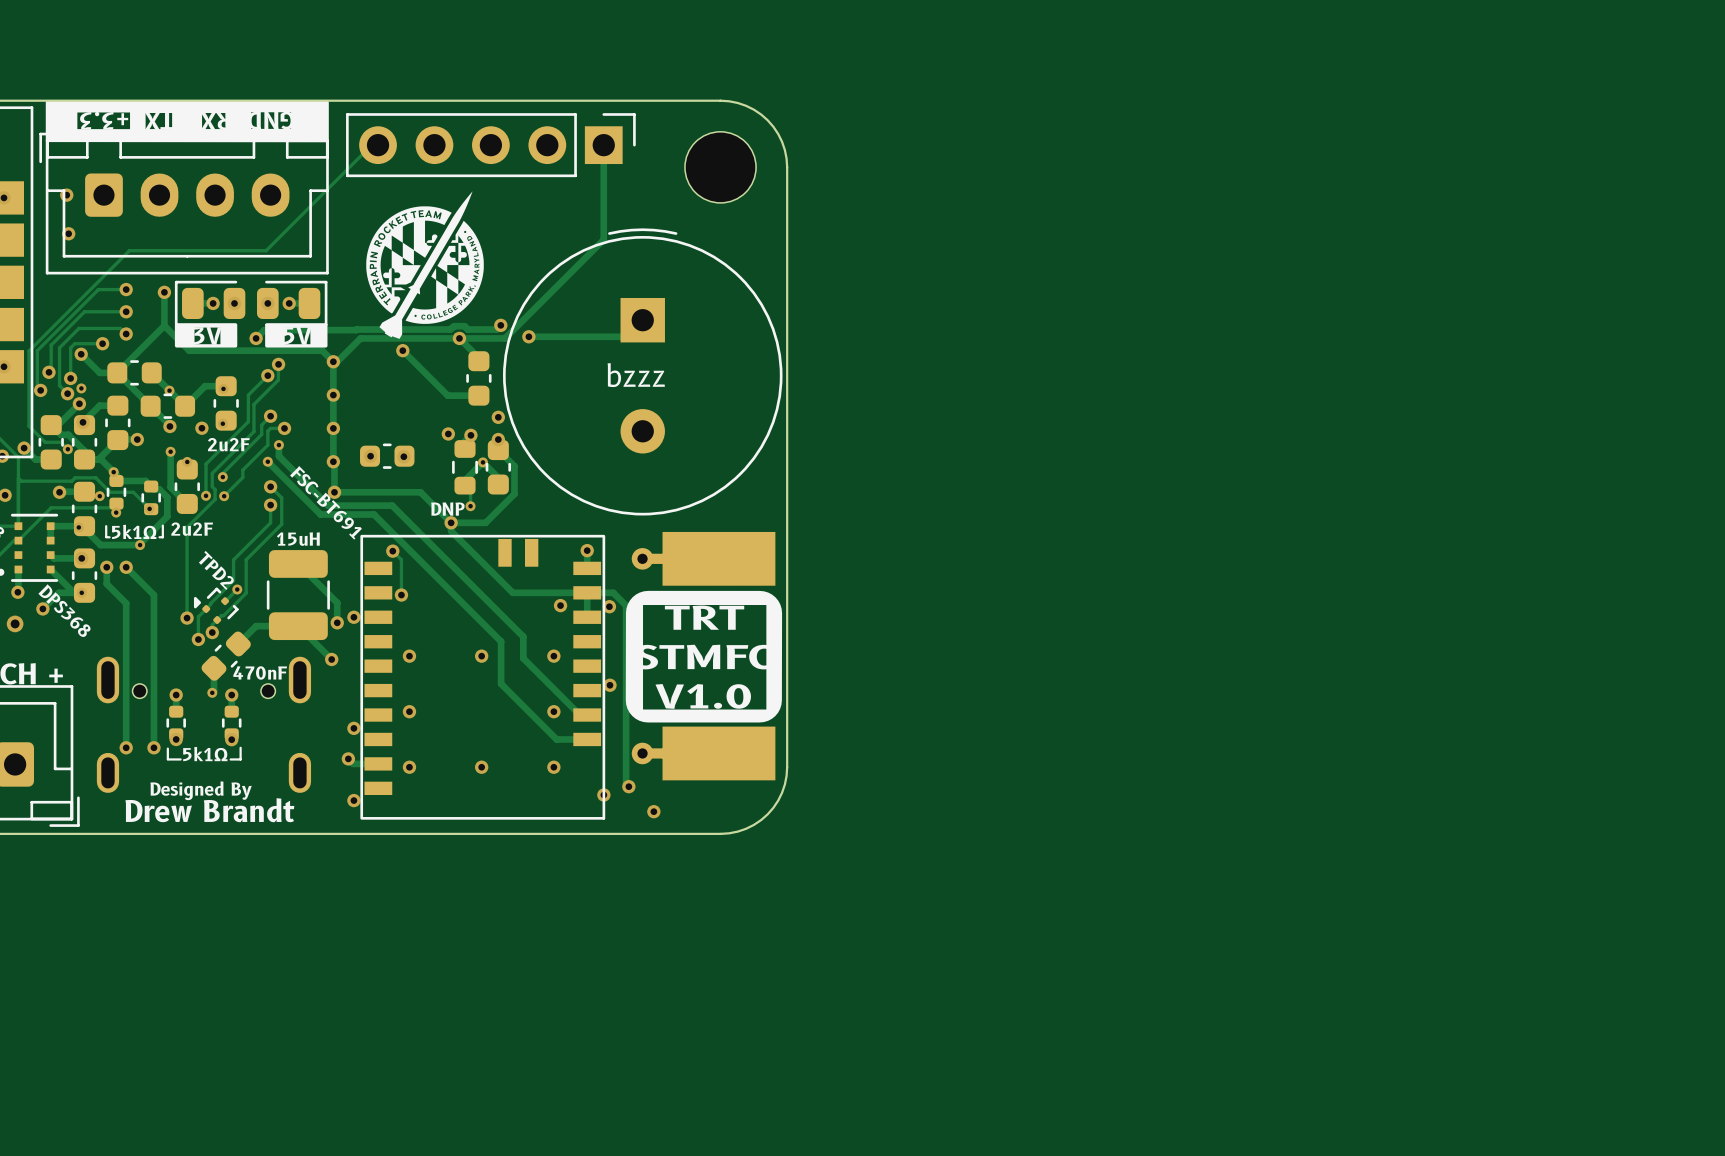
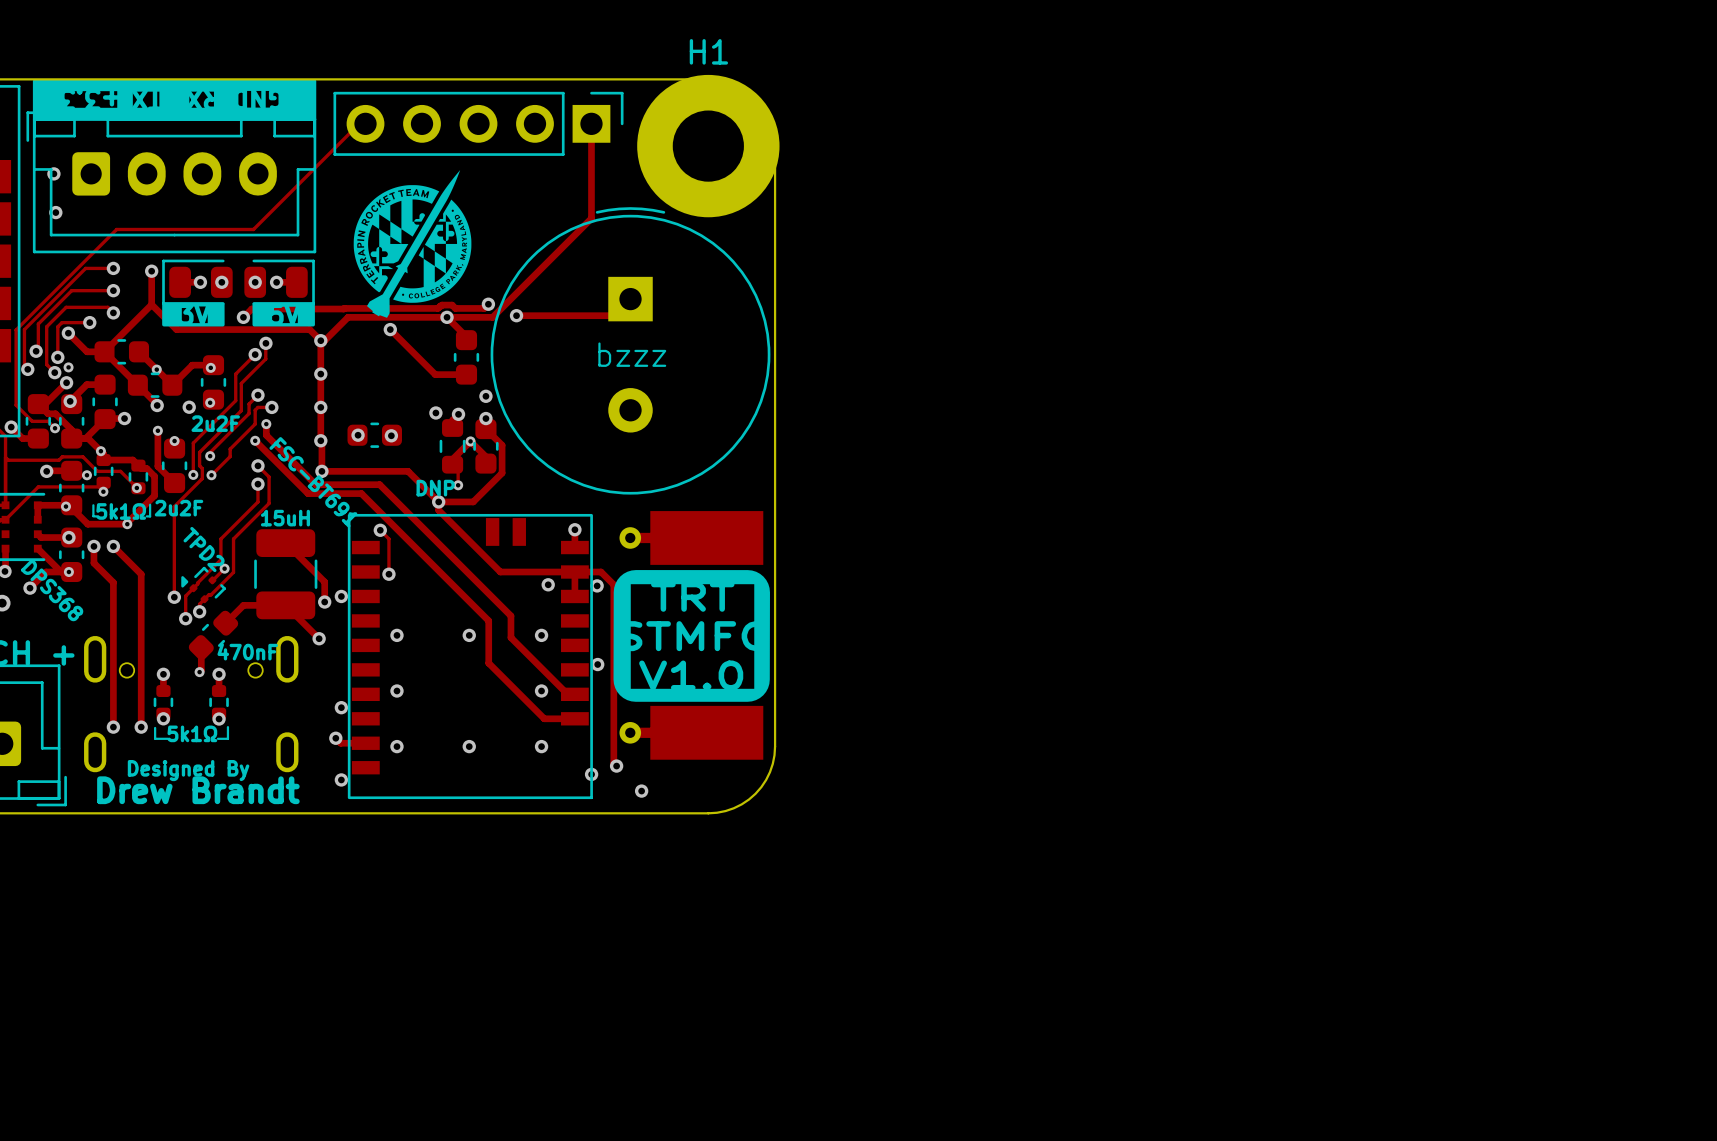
part: (720, 167) -> none
H1: none -> (708, 146)

